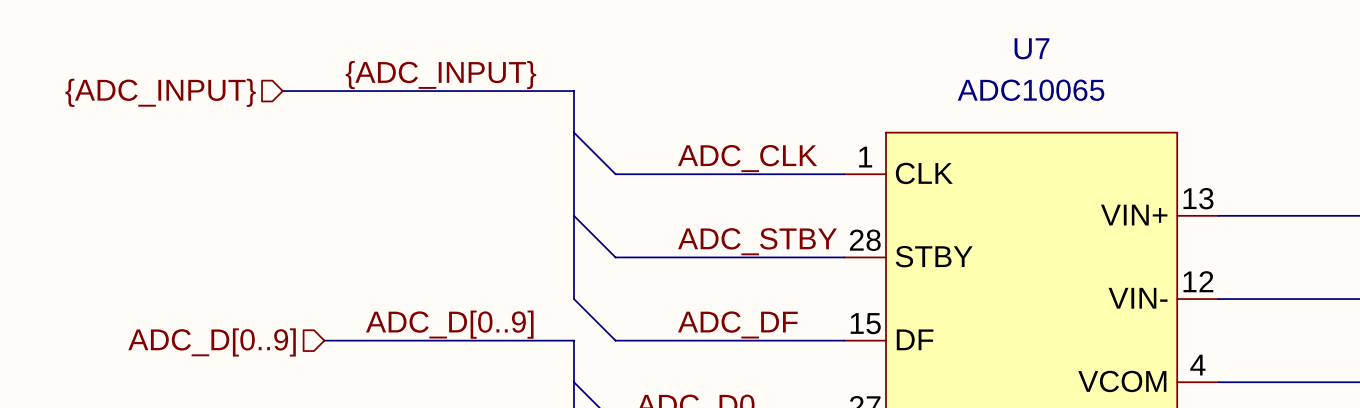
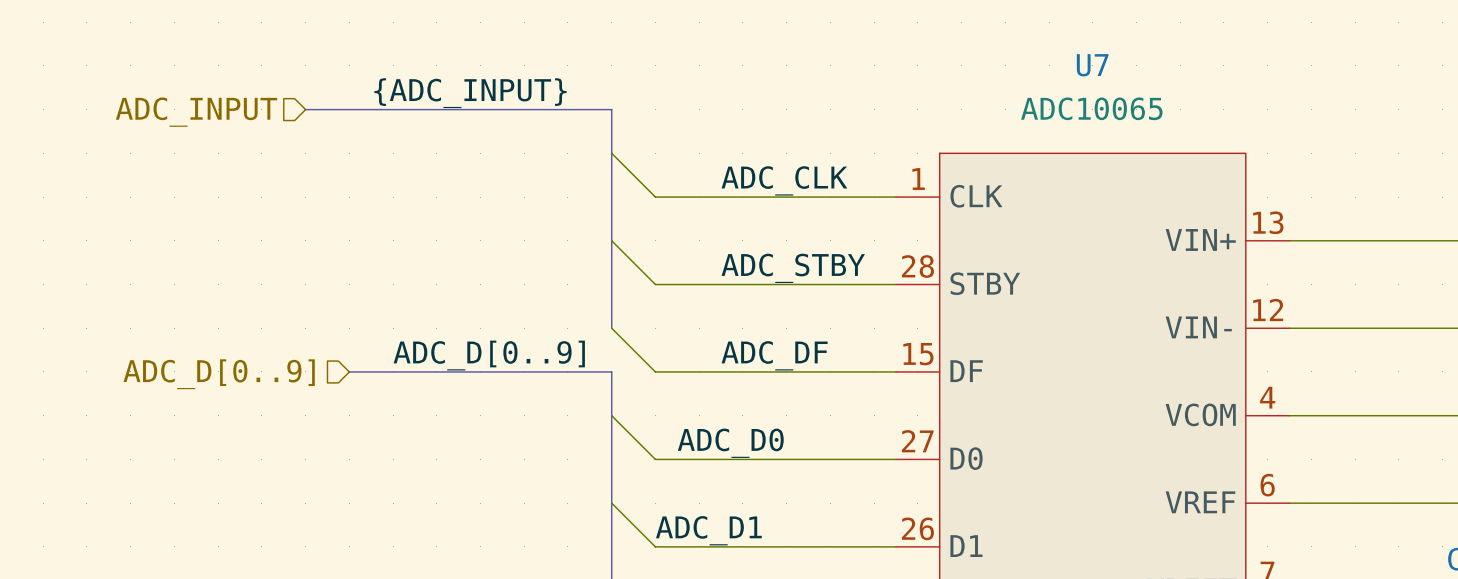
hierarchical label: {ADC_INPUT} (160, 92) -> ADC_INPUT (196, 112)

